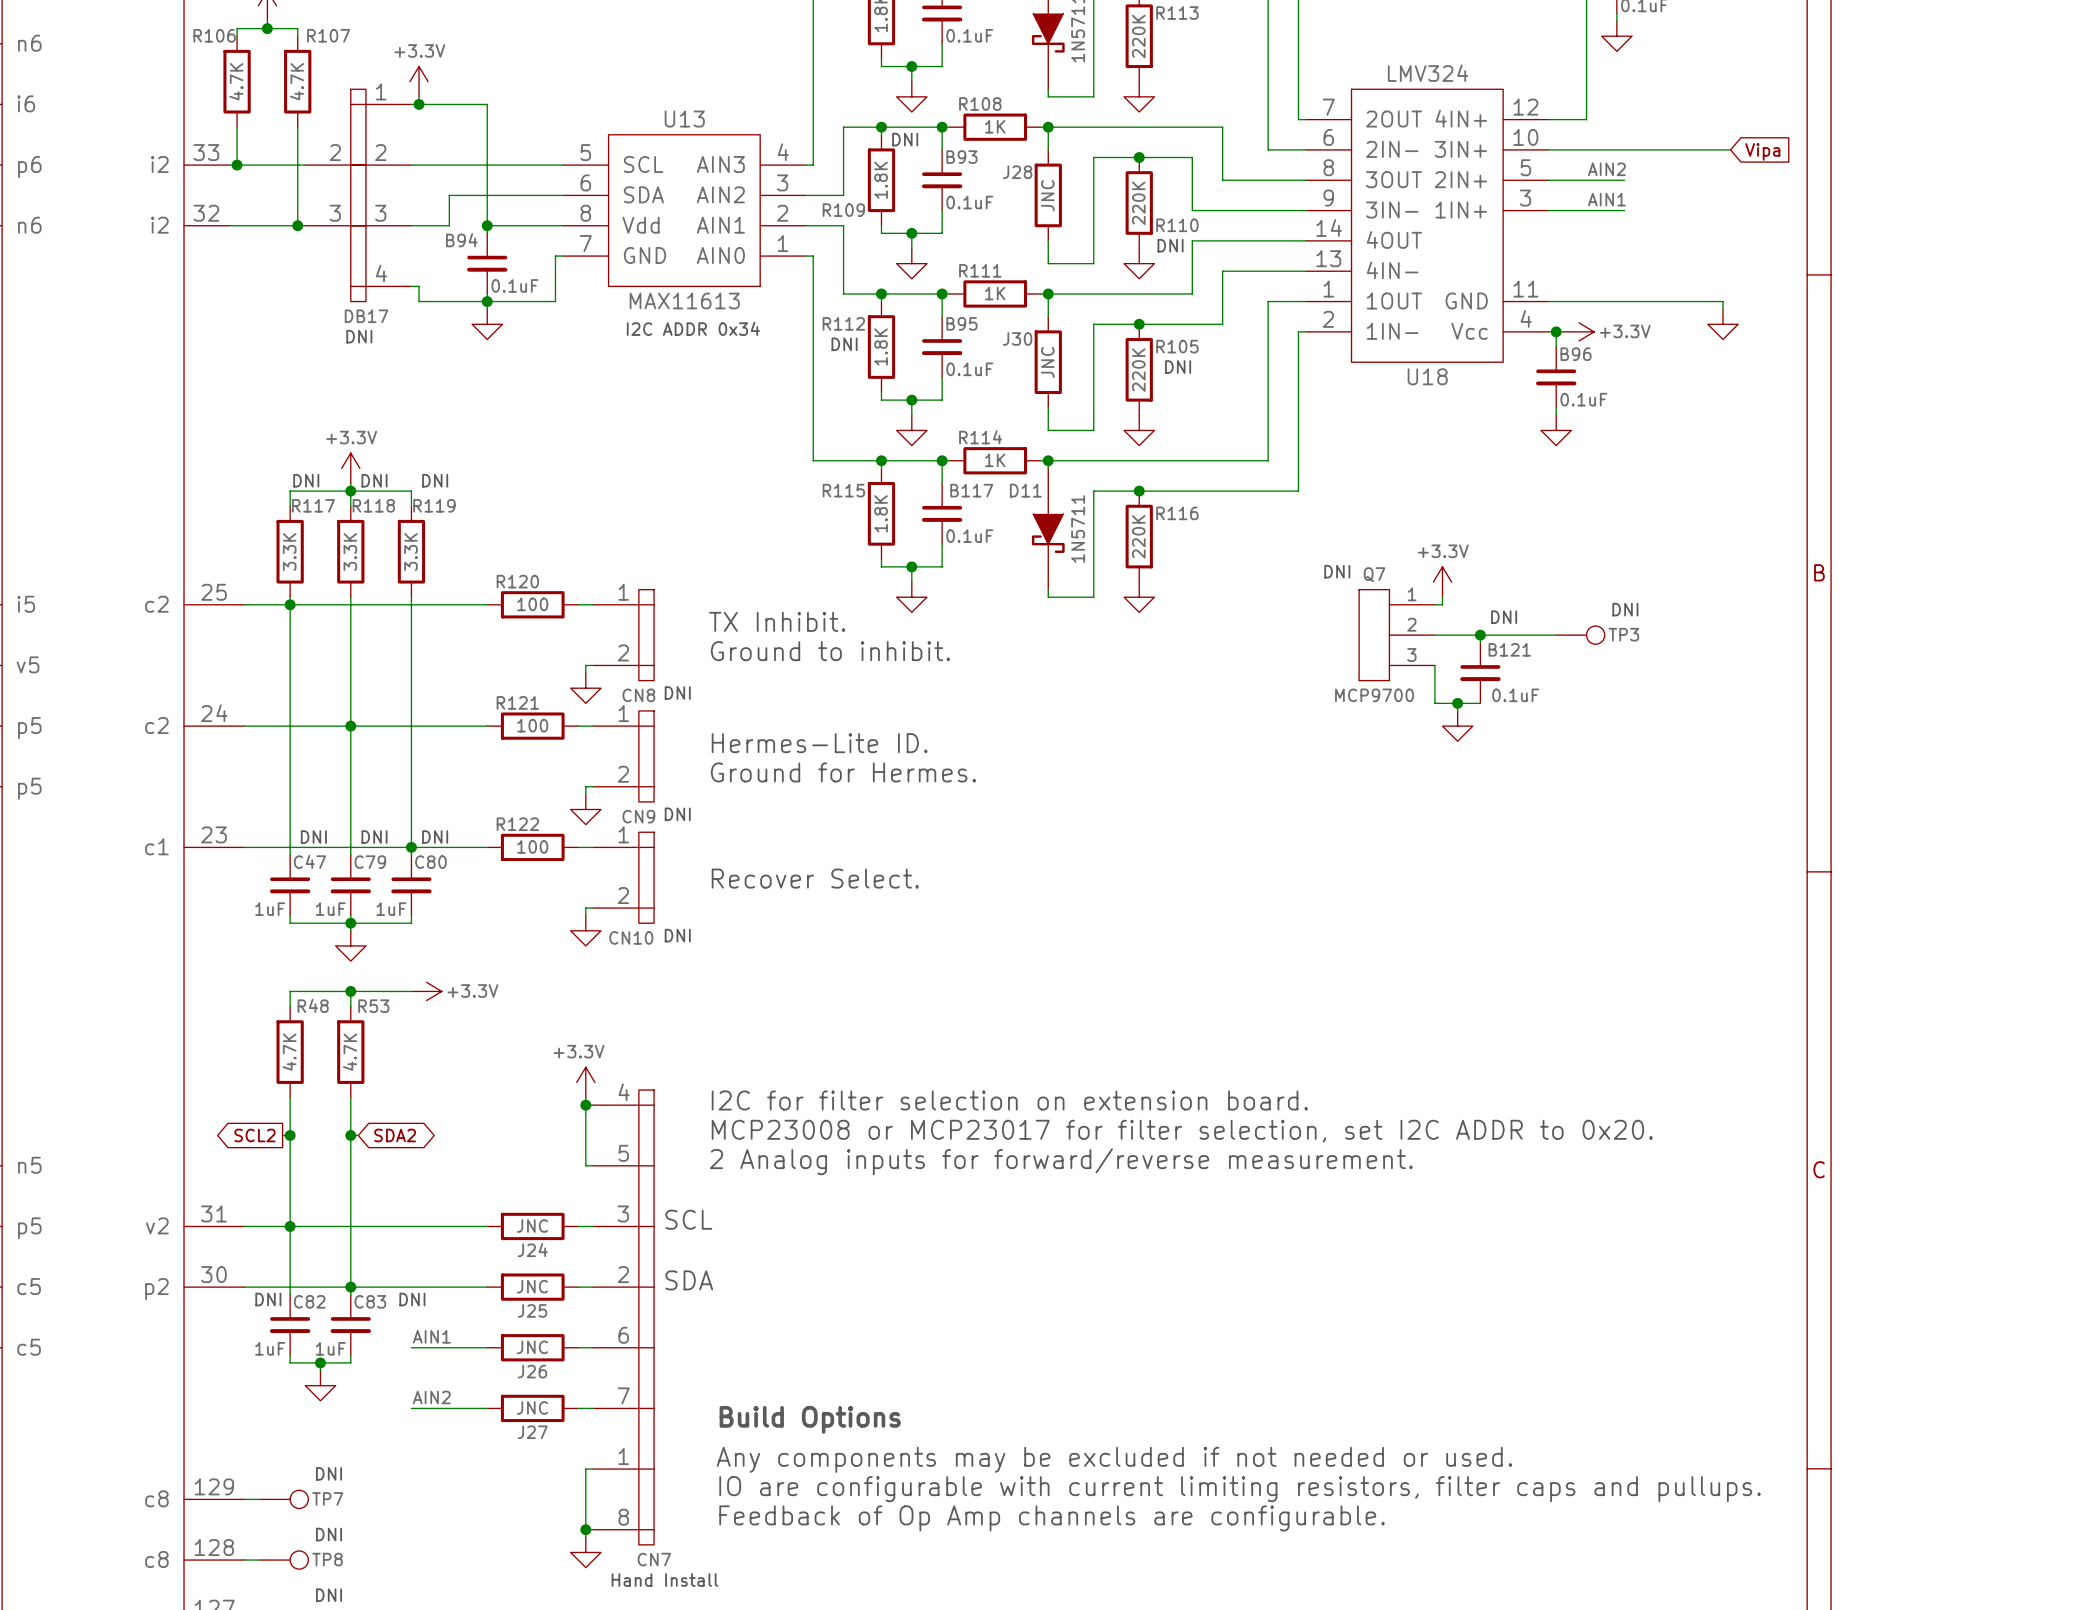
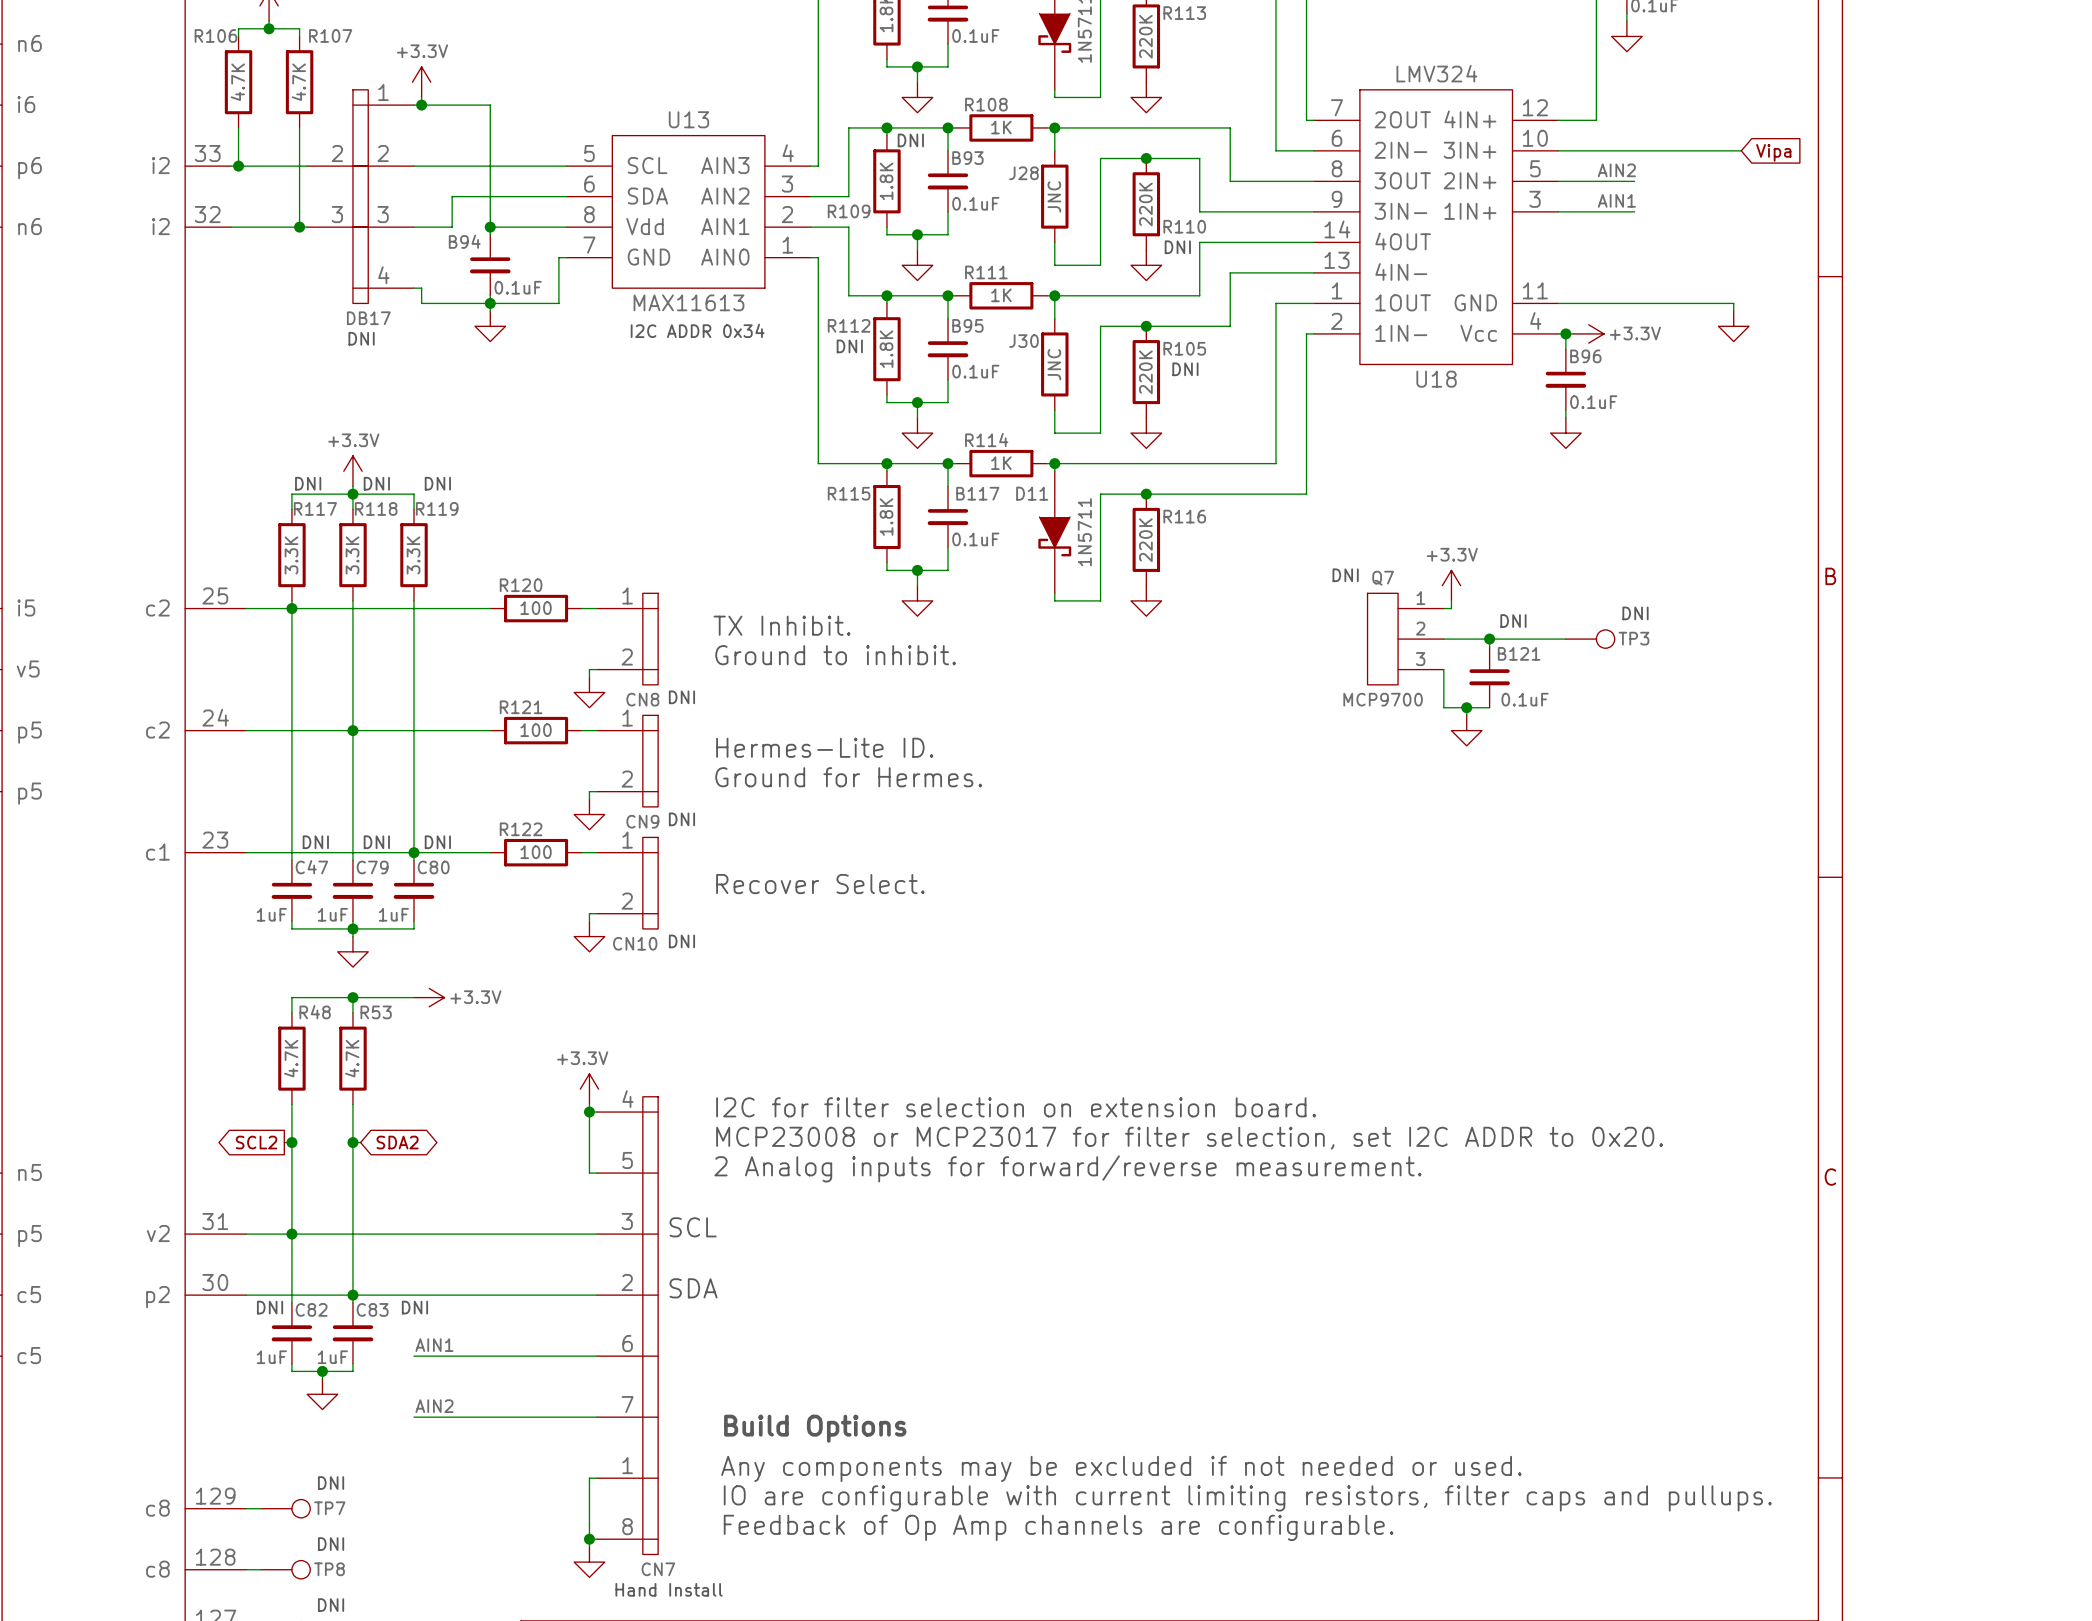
wire: none -> (490, 1234) (581, 1234)
J24: JNC (532, 1226) -> none
wire: none -> (490, 1295) (581, 1295)
J25: JNC (532, 1287) -> none
wire: none -> (490, 1356) (581, 1356)
J26: JNC (532, 1347) -> none
wire: none -> (490, 1417) (581, 1417)
J27: JNC (532, 1408) -> none

